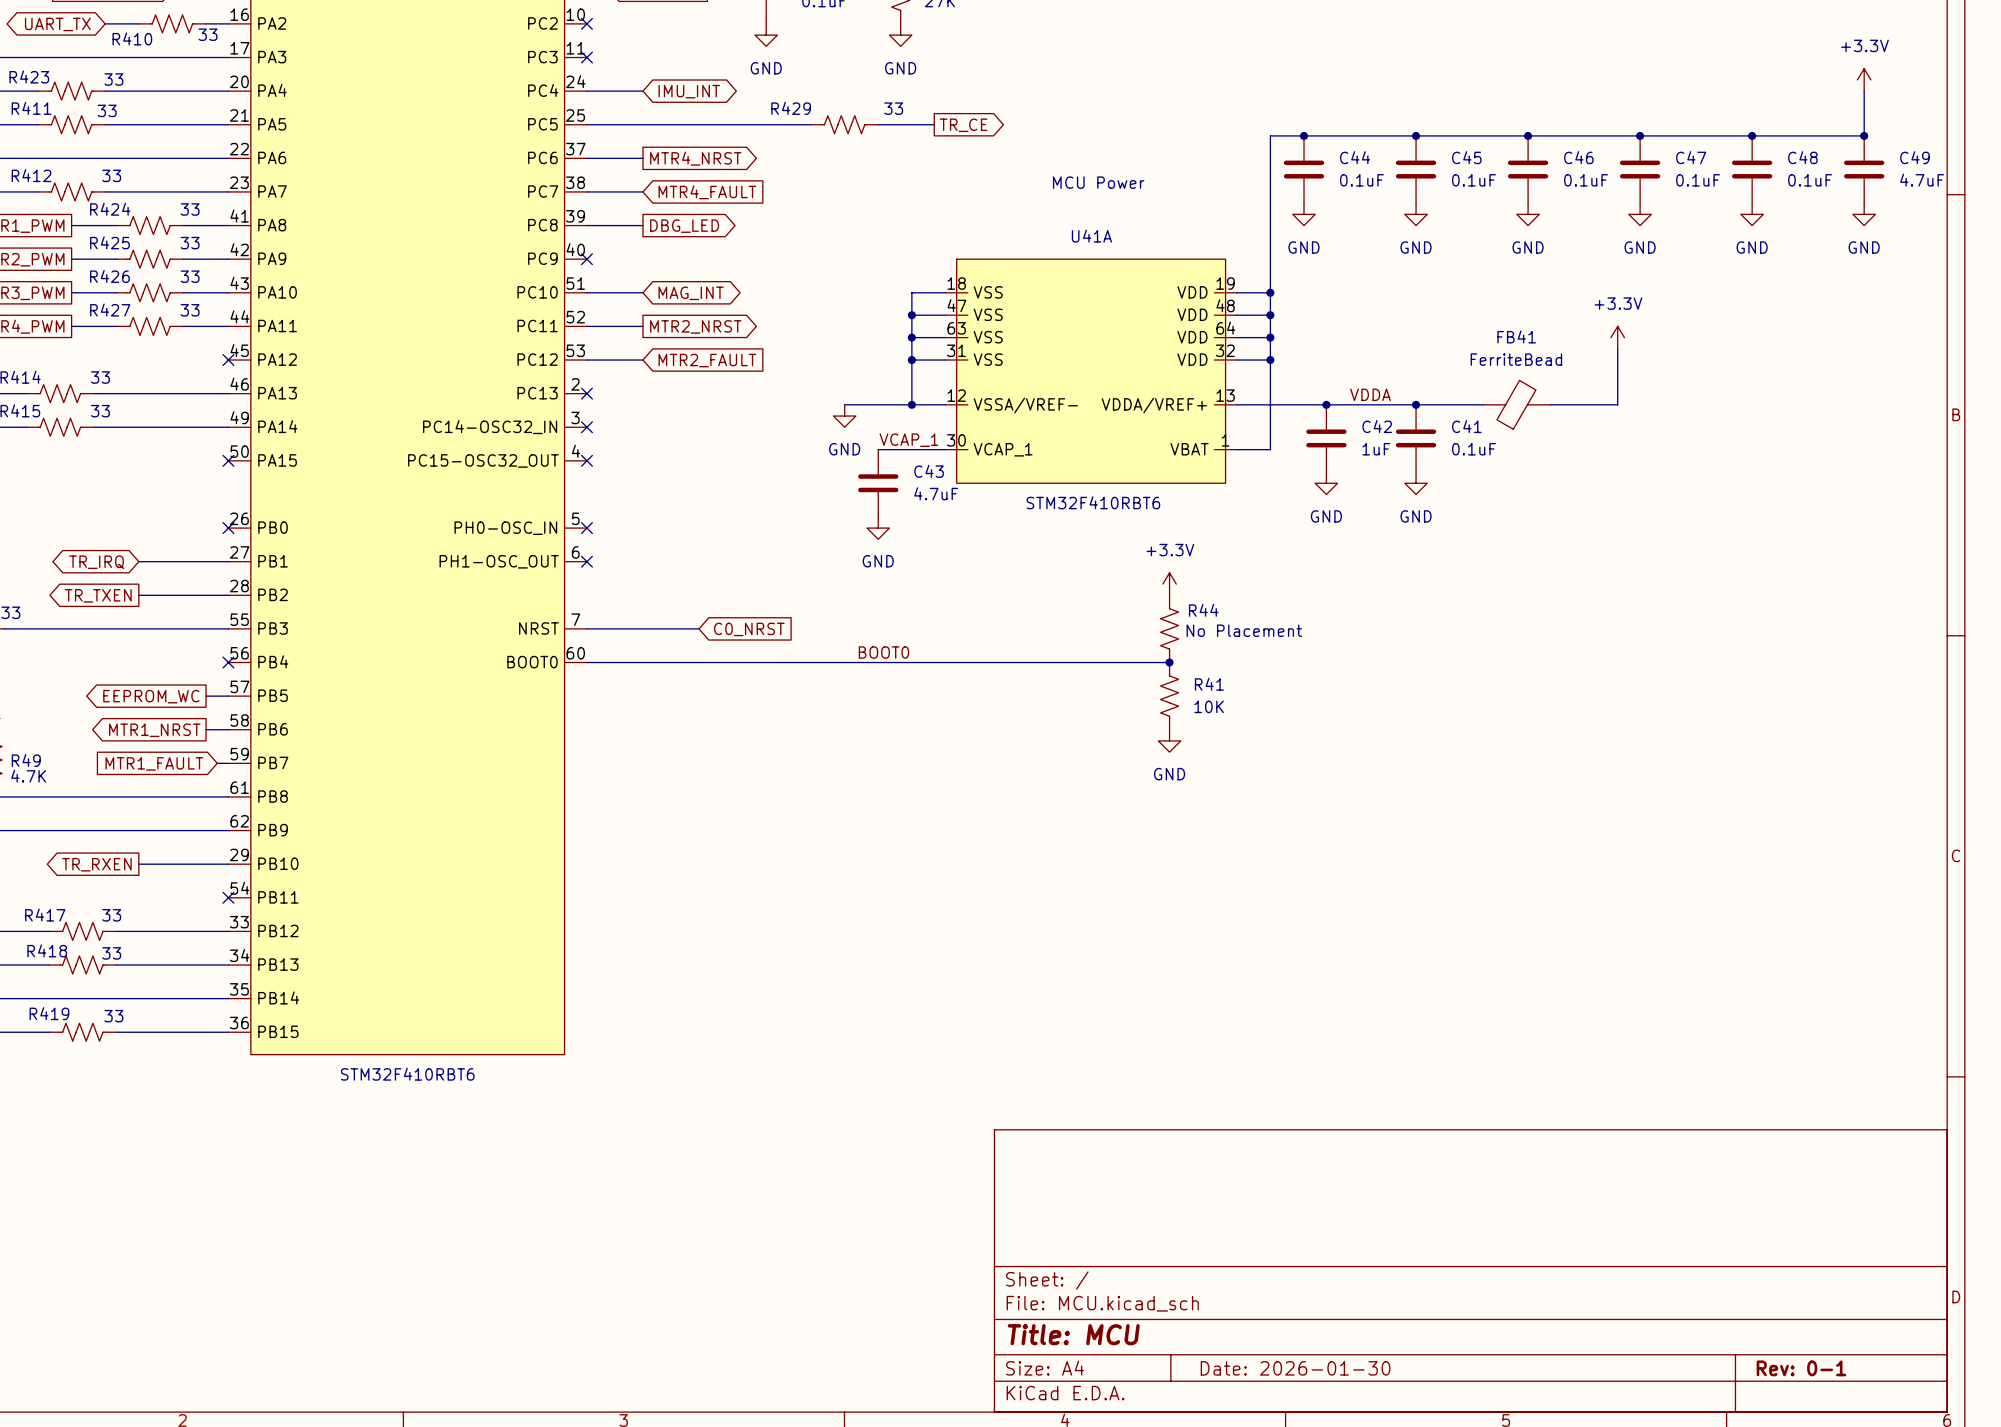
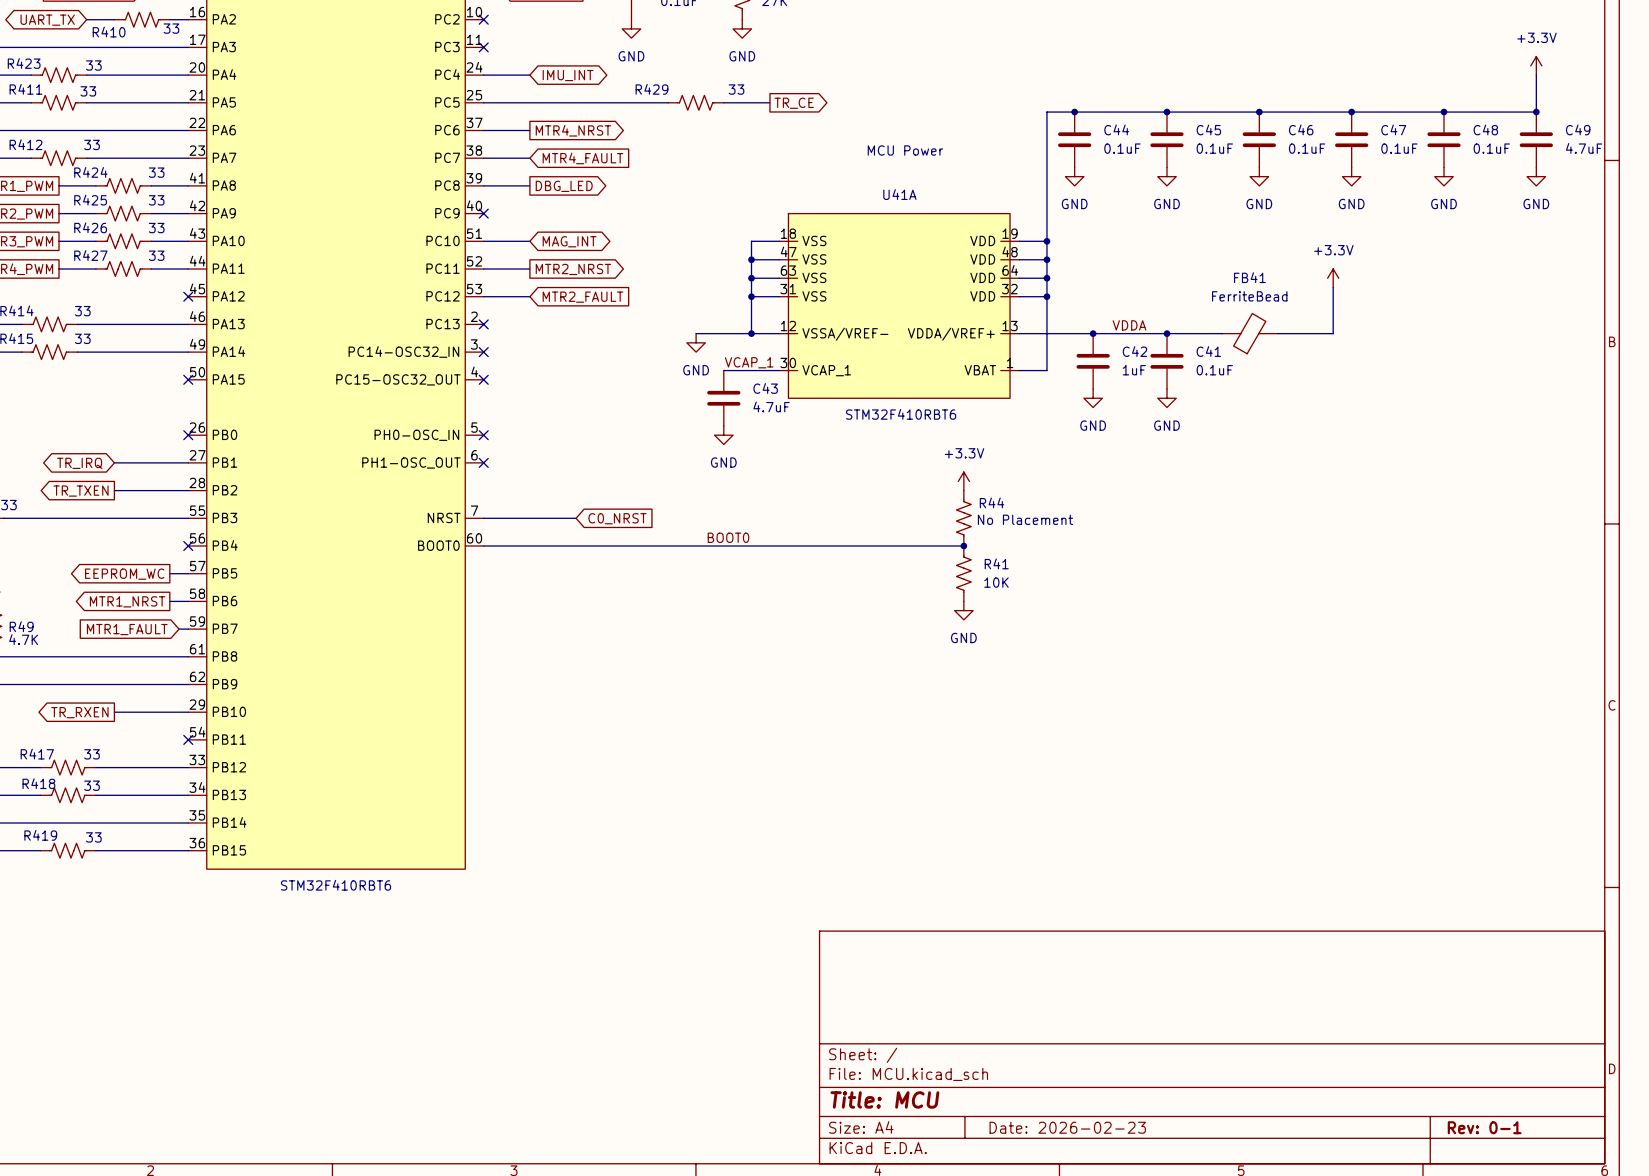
title block: Date: 2026-01-30 (1295, 1368) -> Date: 2026-02-23 (1067, 1127)

